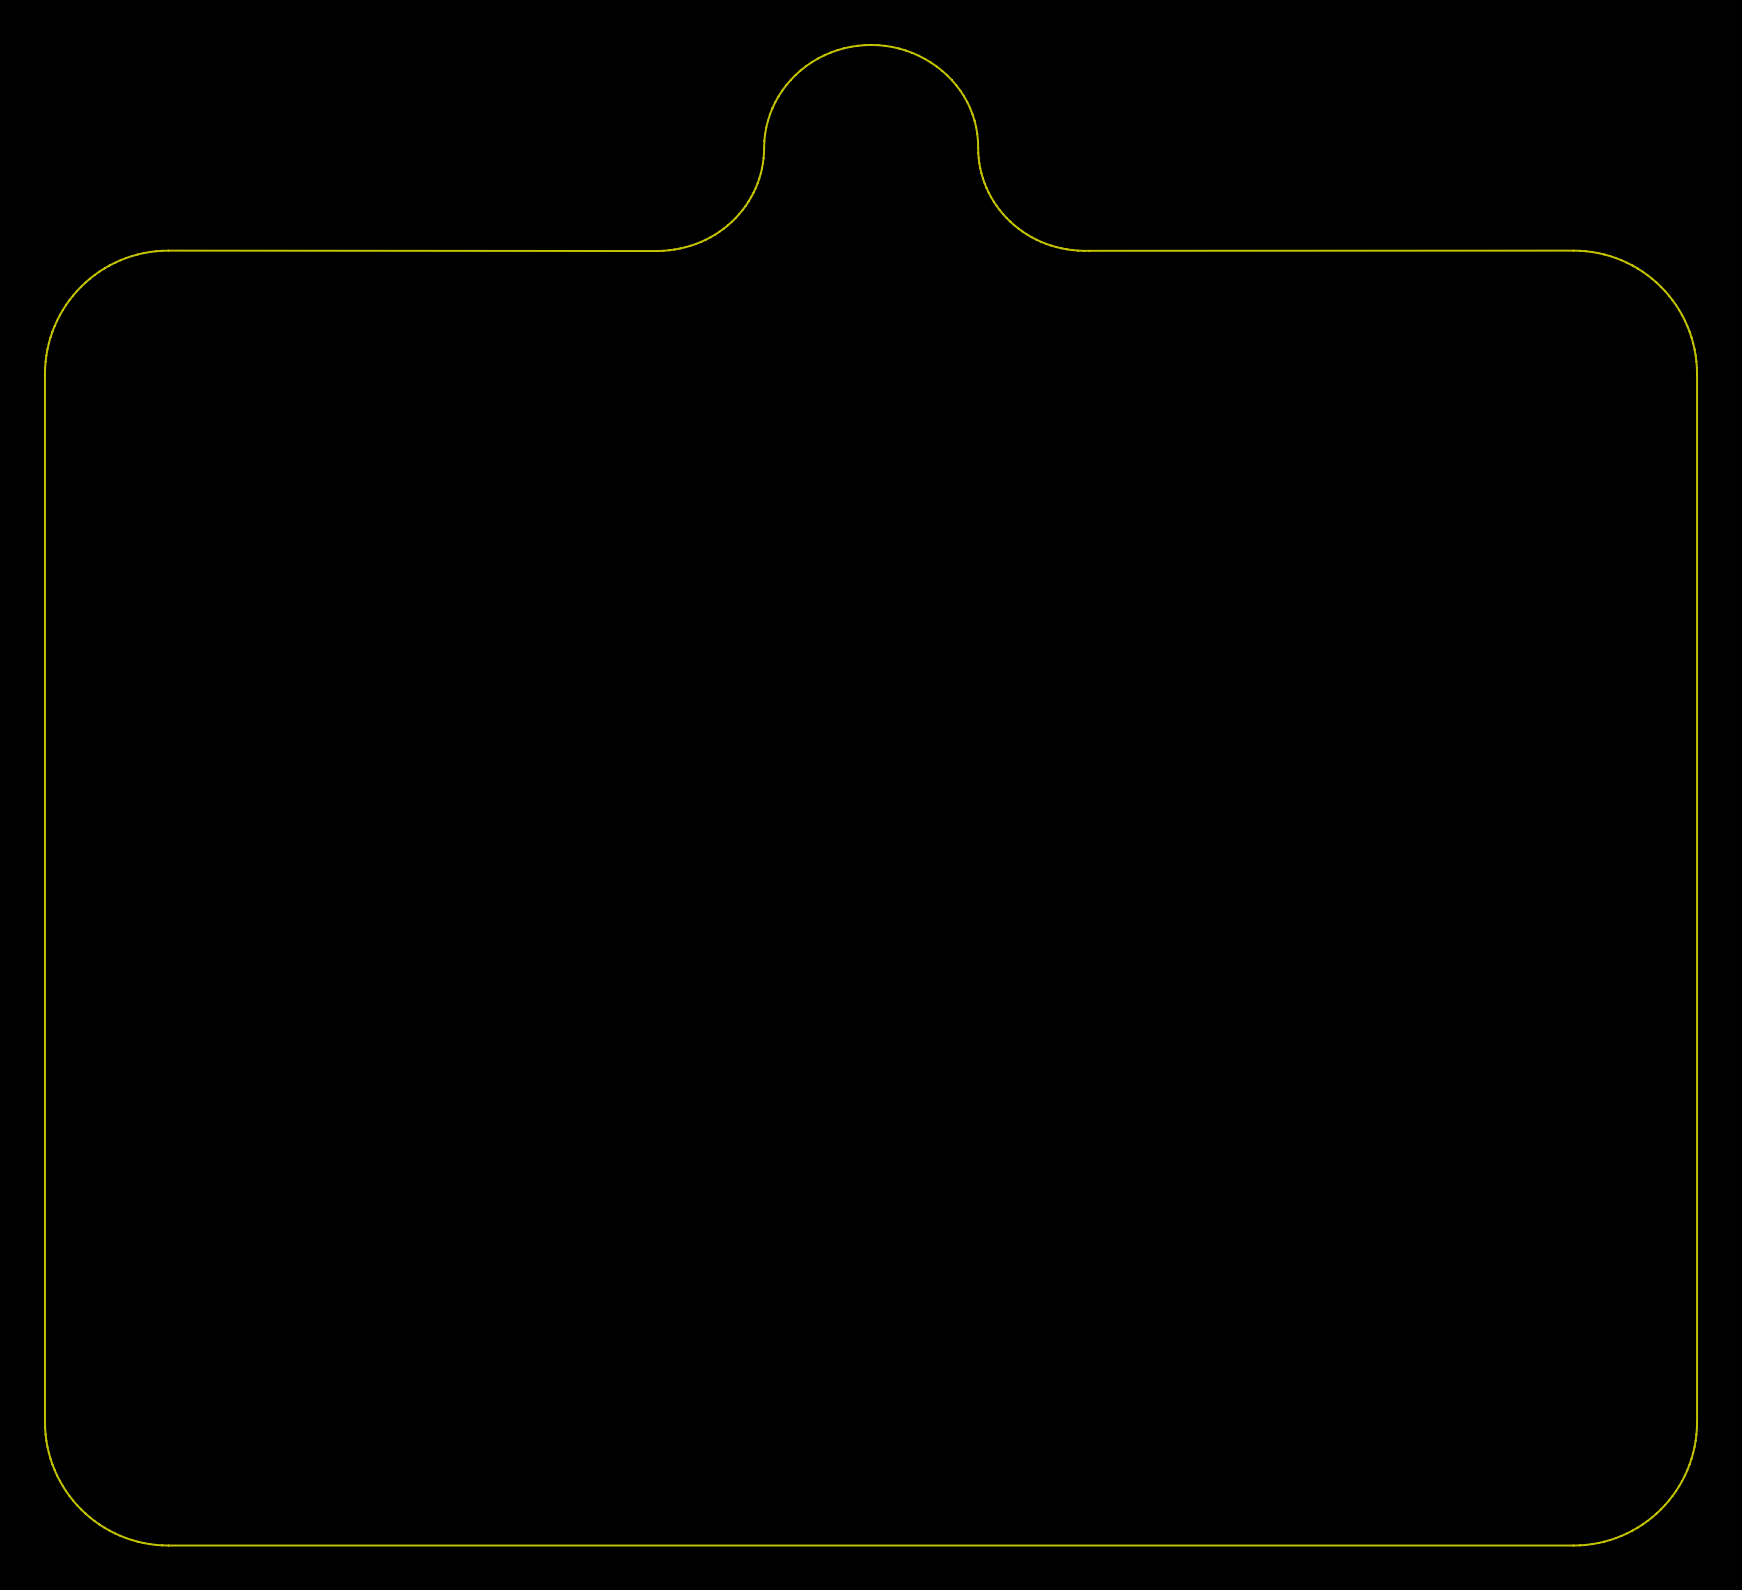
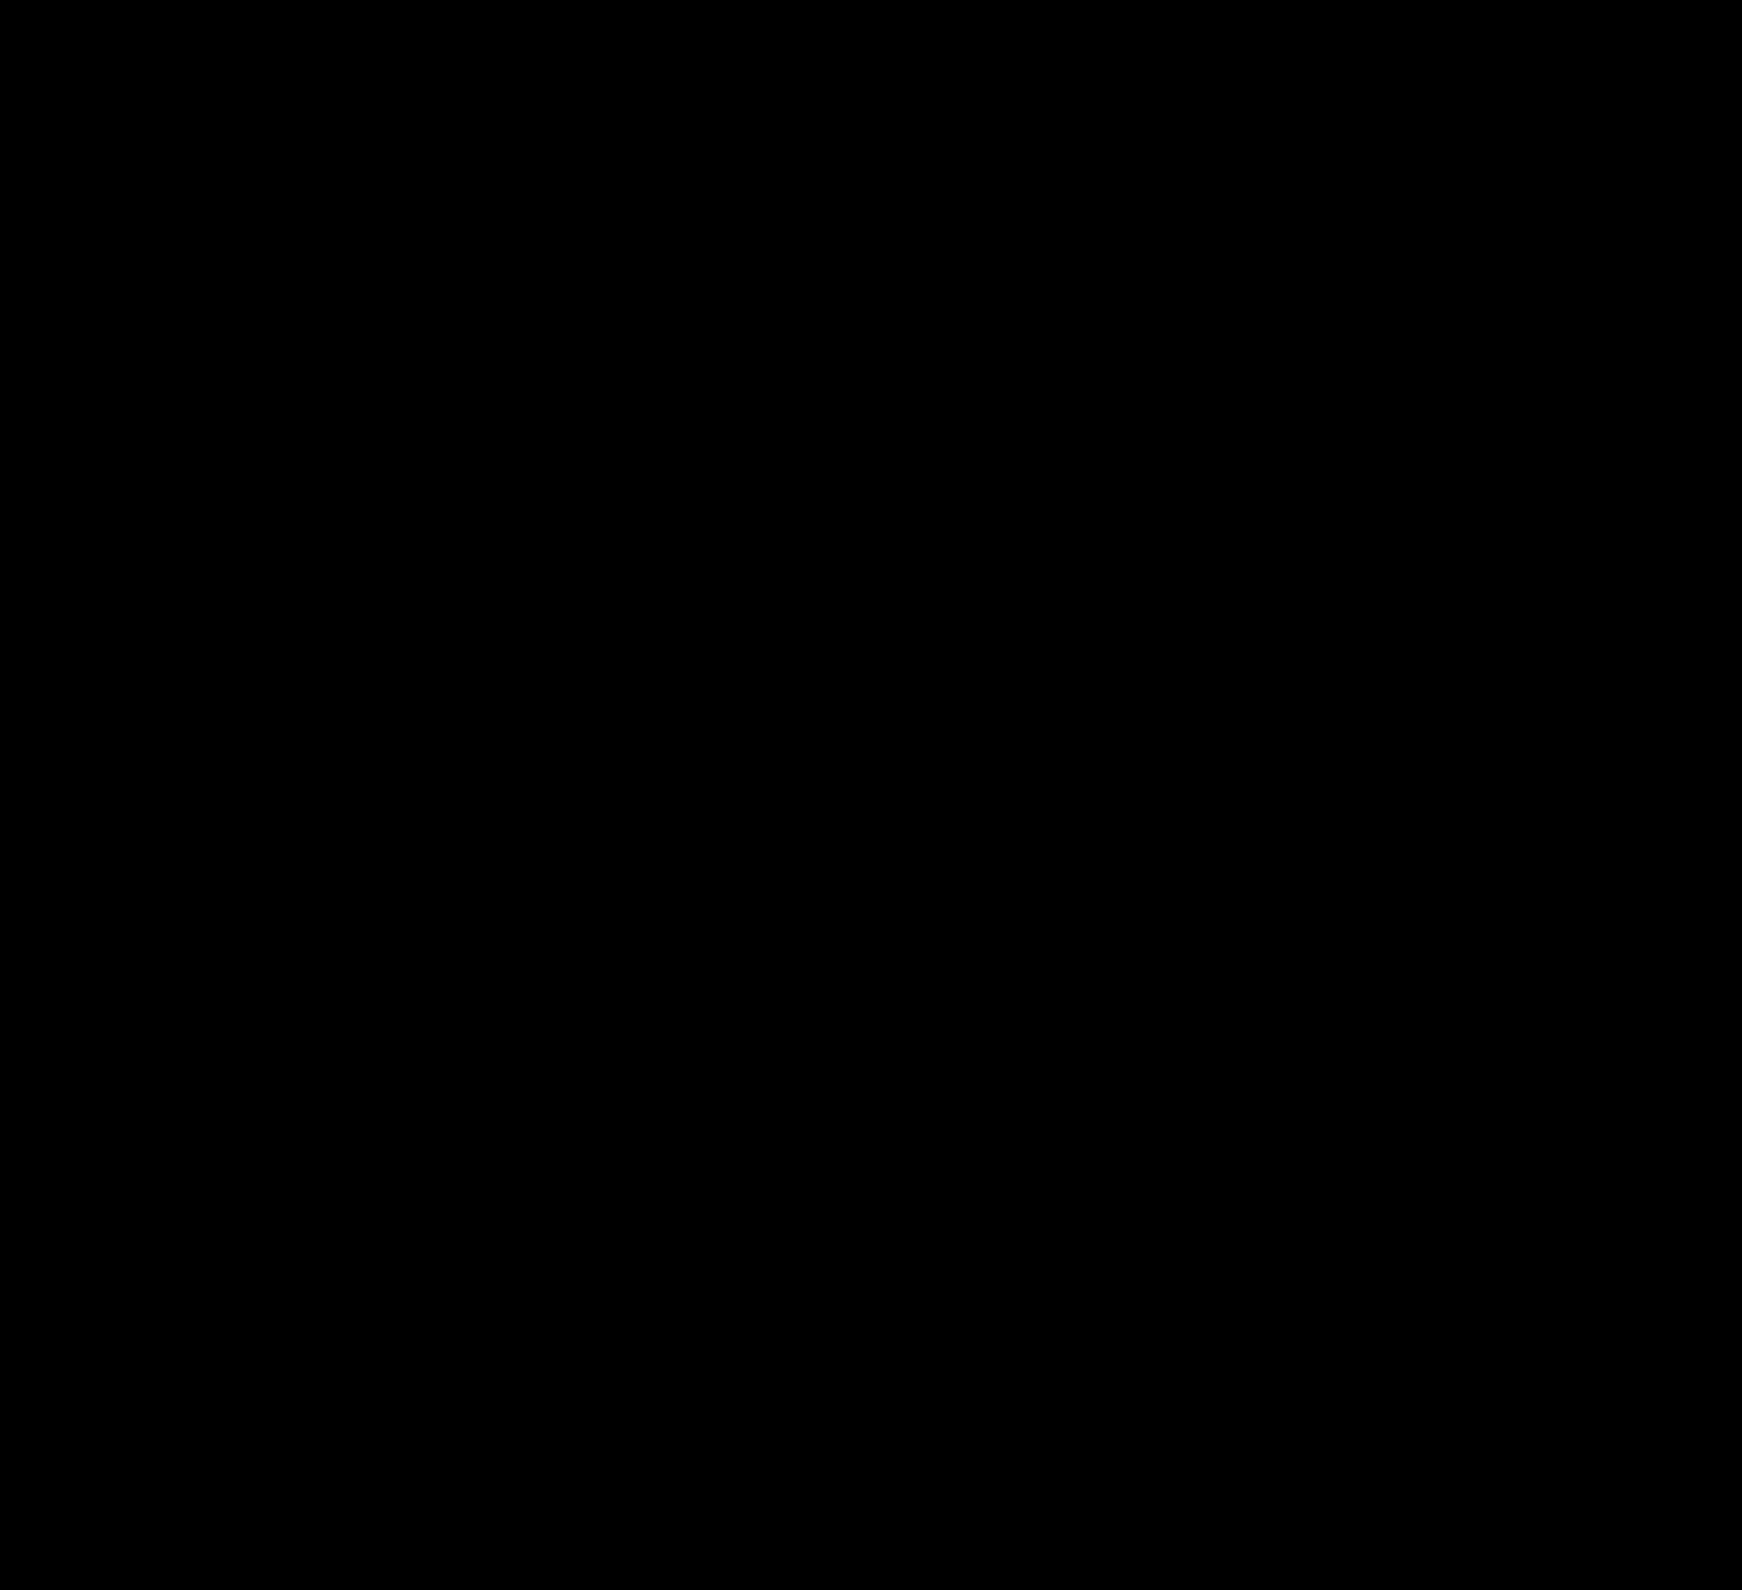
board edge: (871, 44) (892, 46) (912, 52) (931, 62) (952, 80) (964, 96) (972, 114) (977, 133) (981, 173) (993, 201) (1006, 217) (1018, 228) (1036, 239) (1051, 245) (1083, 250) (1586, 251) (1616, 258) (1642, 271) (1665, 291) (1682, 315) (1693, 343) (1697, 374) (1697, 1421) (1694, 1446) (1684, 1475) (1668, 1500) (1642, 1524) (1610, 1539) (1579, 1545) (168, 1545) (143, 1543) (114, 1533) (89, 1517) (66, 1491) (50, 1458) (45, 1428) (44, 374) (47, 349) (57, 320) (73, 295) (99, 271) (126, 258) (155, 251) (657, 251) (690, 245) (705, 239) (723, 228) (735, 218) (748, 201) (760, 173) (765, 134) (769, 114) (778, 96) (790, 79) (806, 66) (824, 55) (844, 48) (871, 44) -> none

